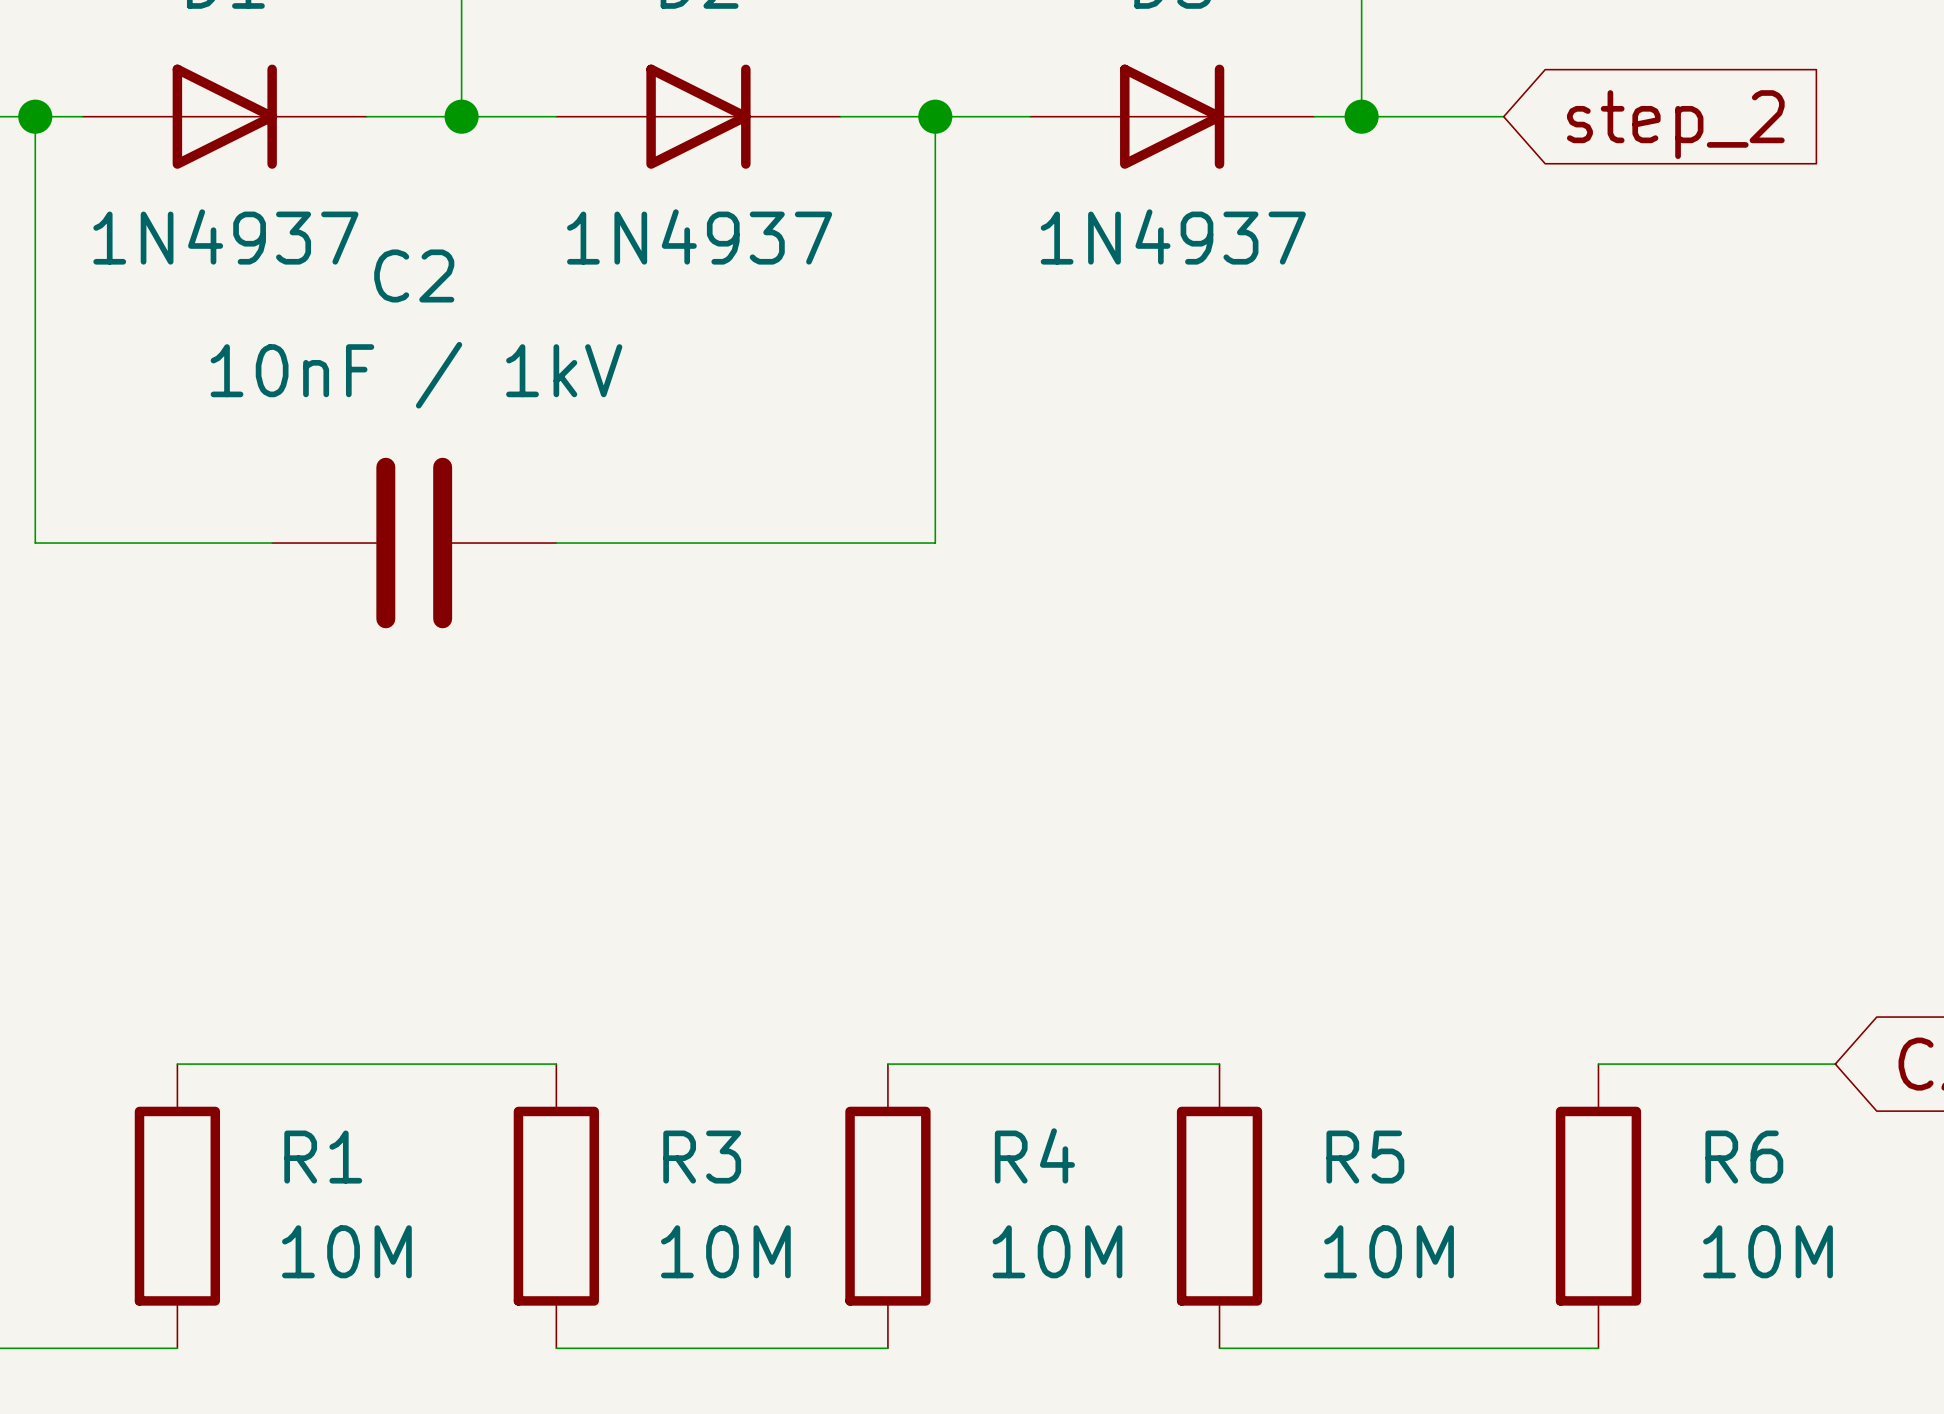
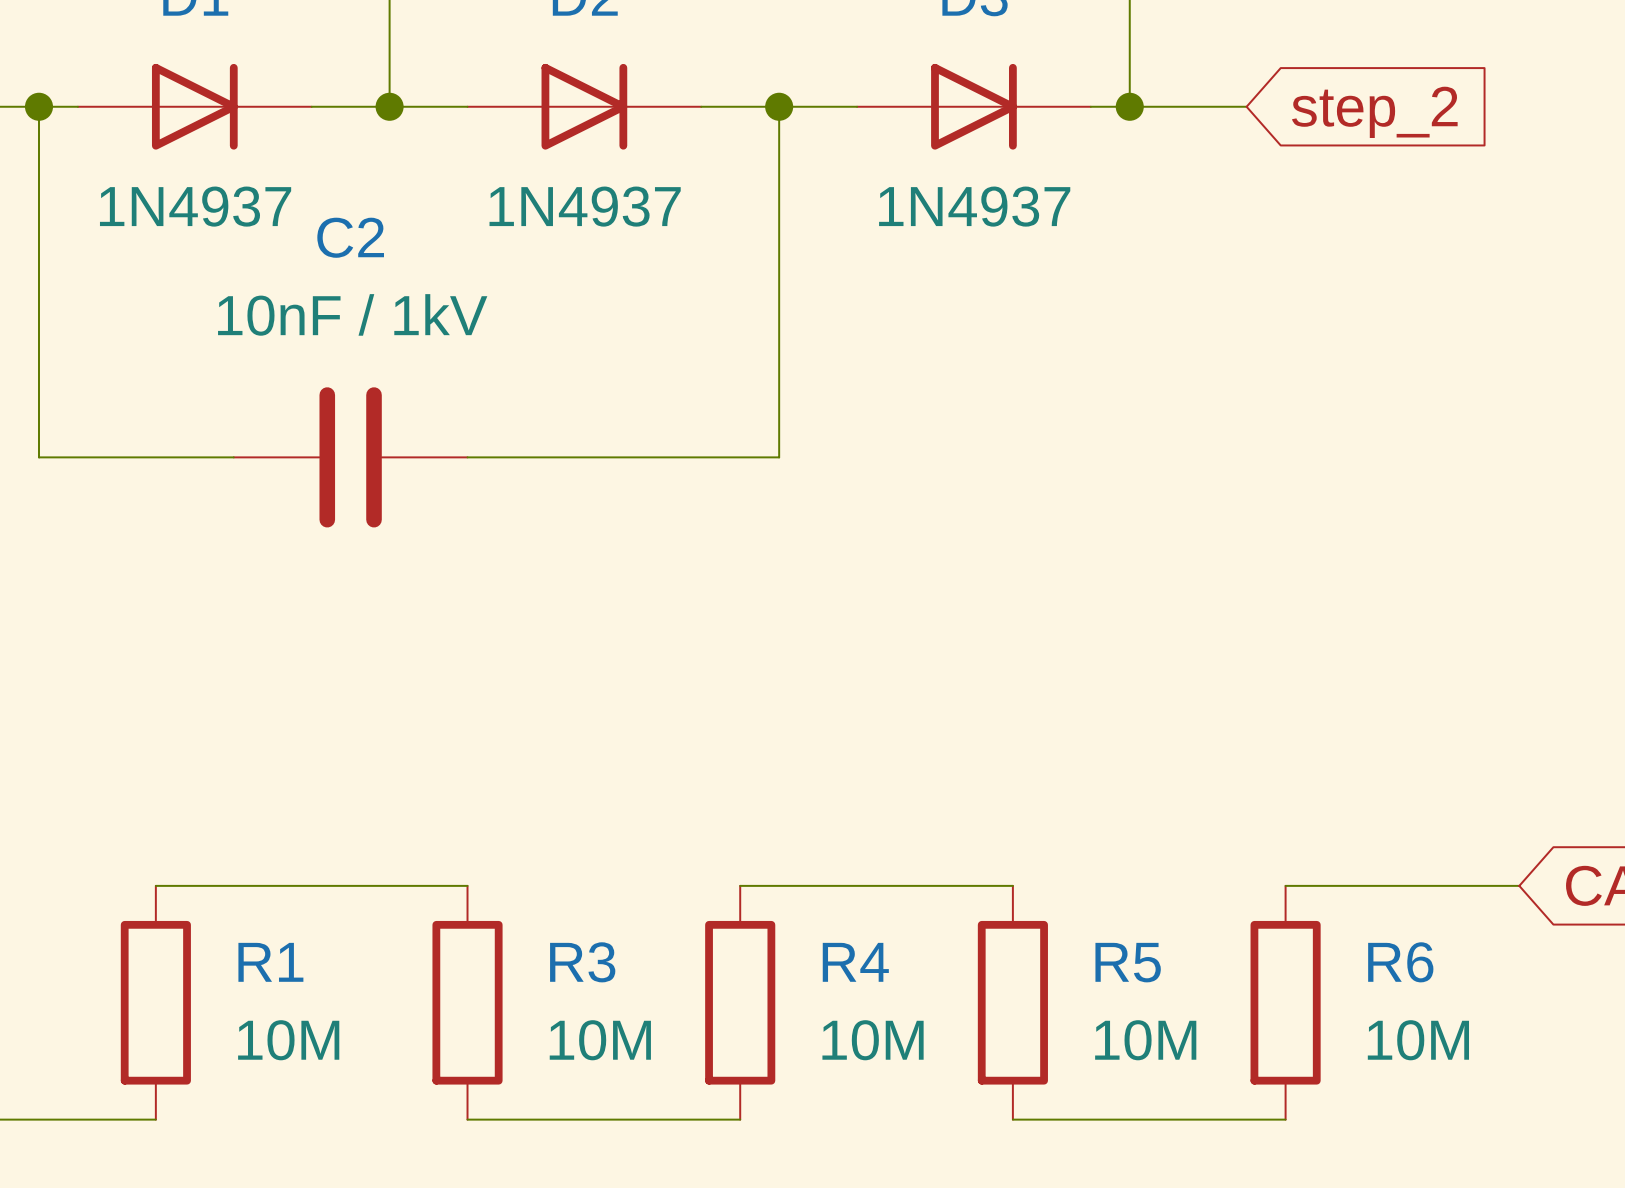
R6 position: (1598, 1206) -> (1285, 1002)
wire: (1551, 1348) (1598, 1348) -> (1285, 885) (1324, 885)

